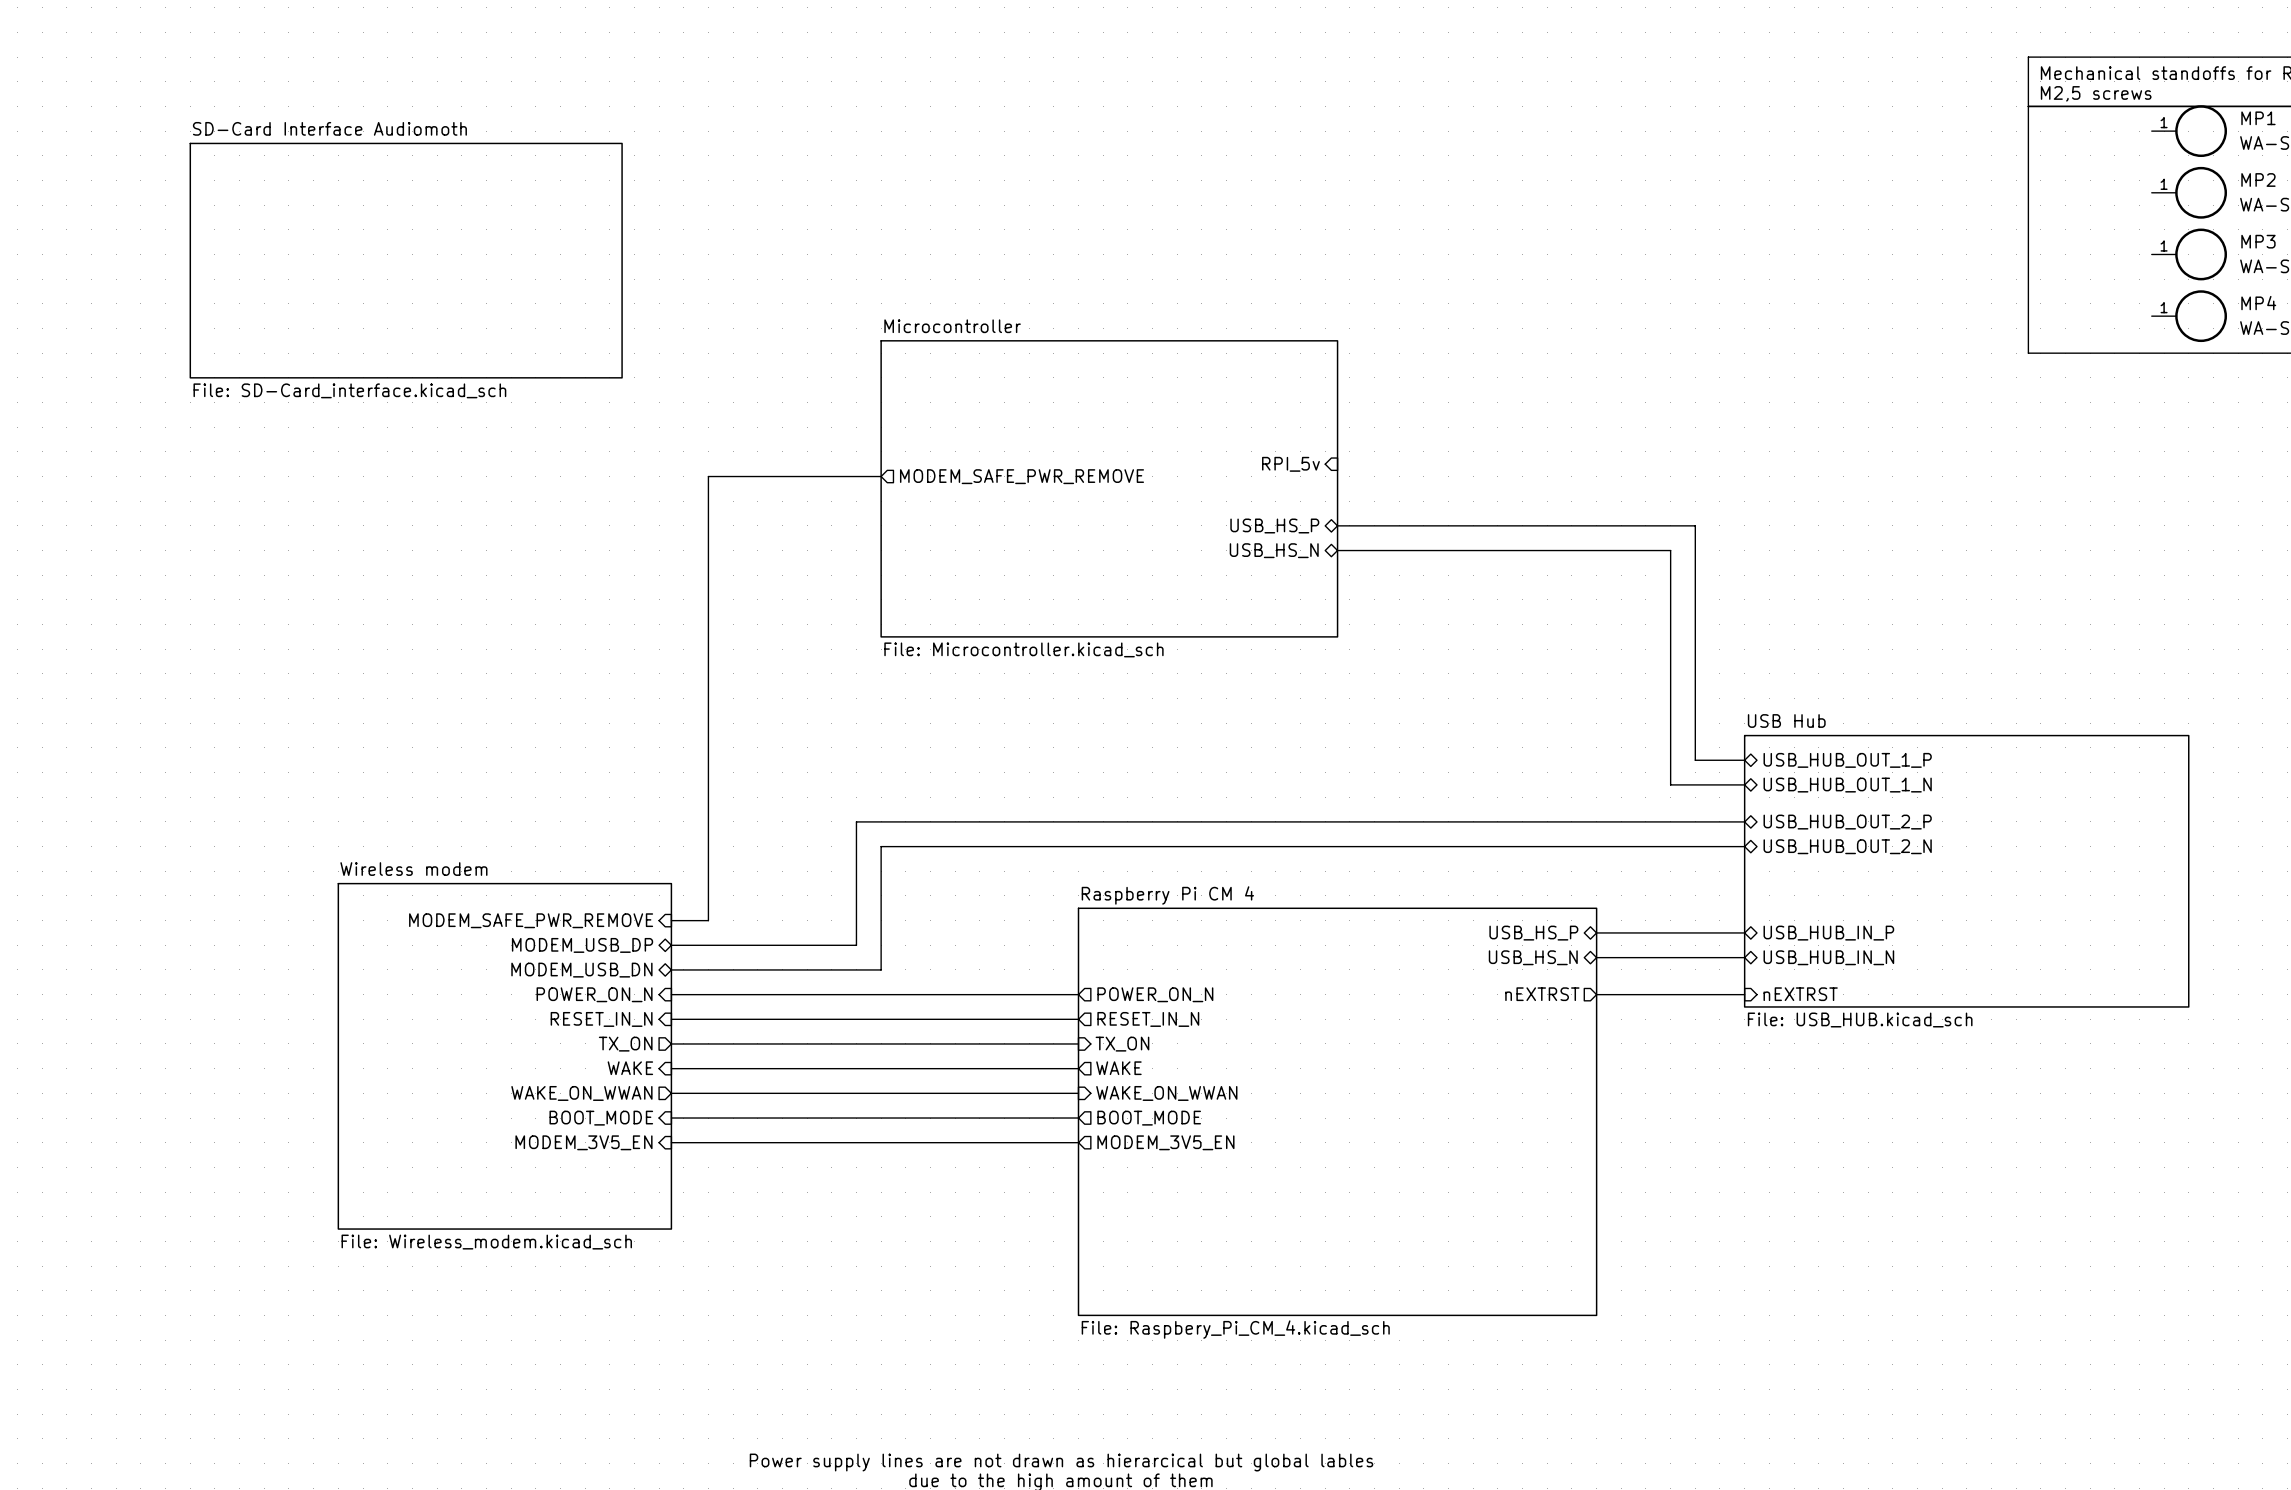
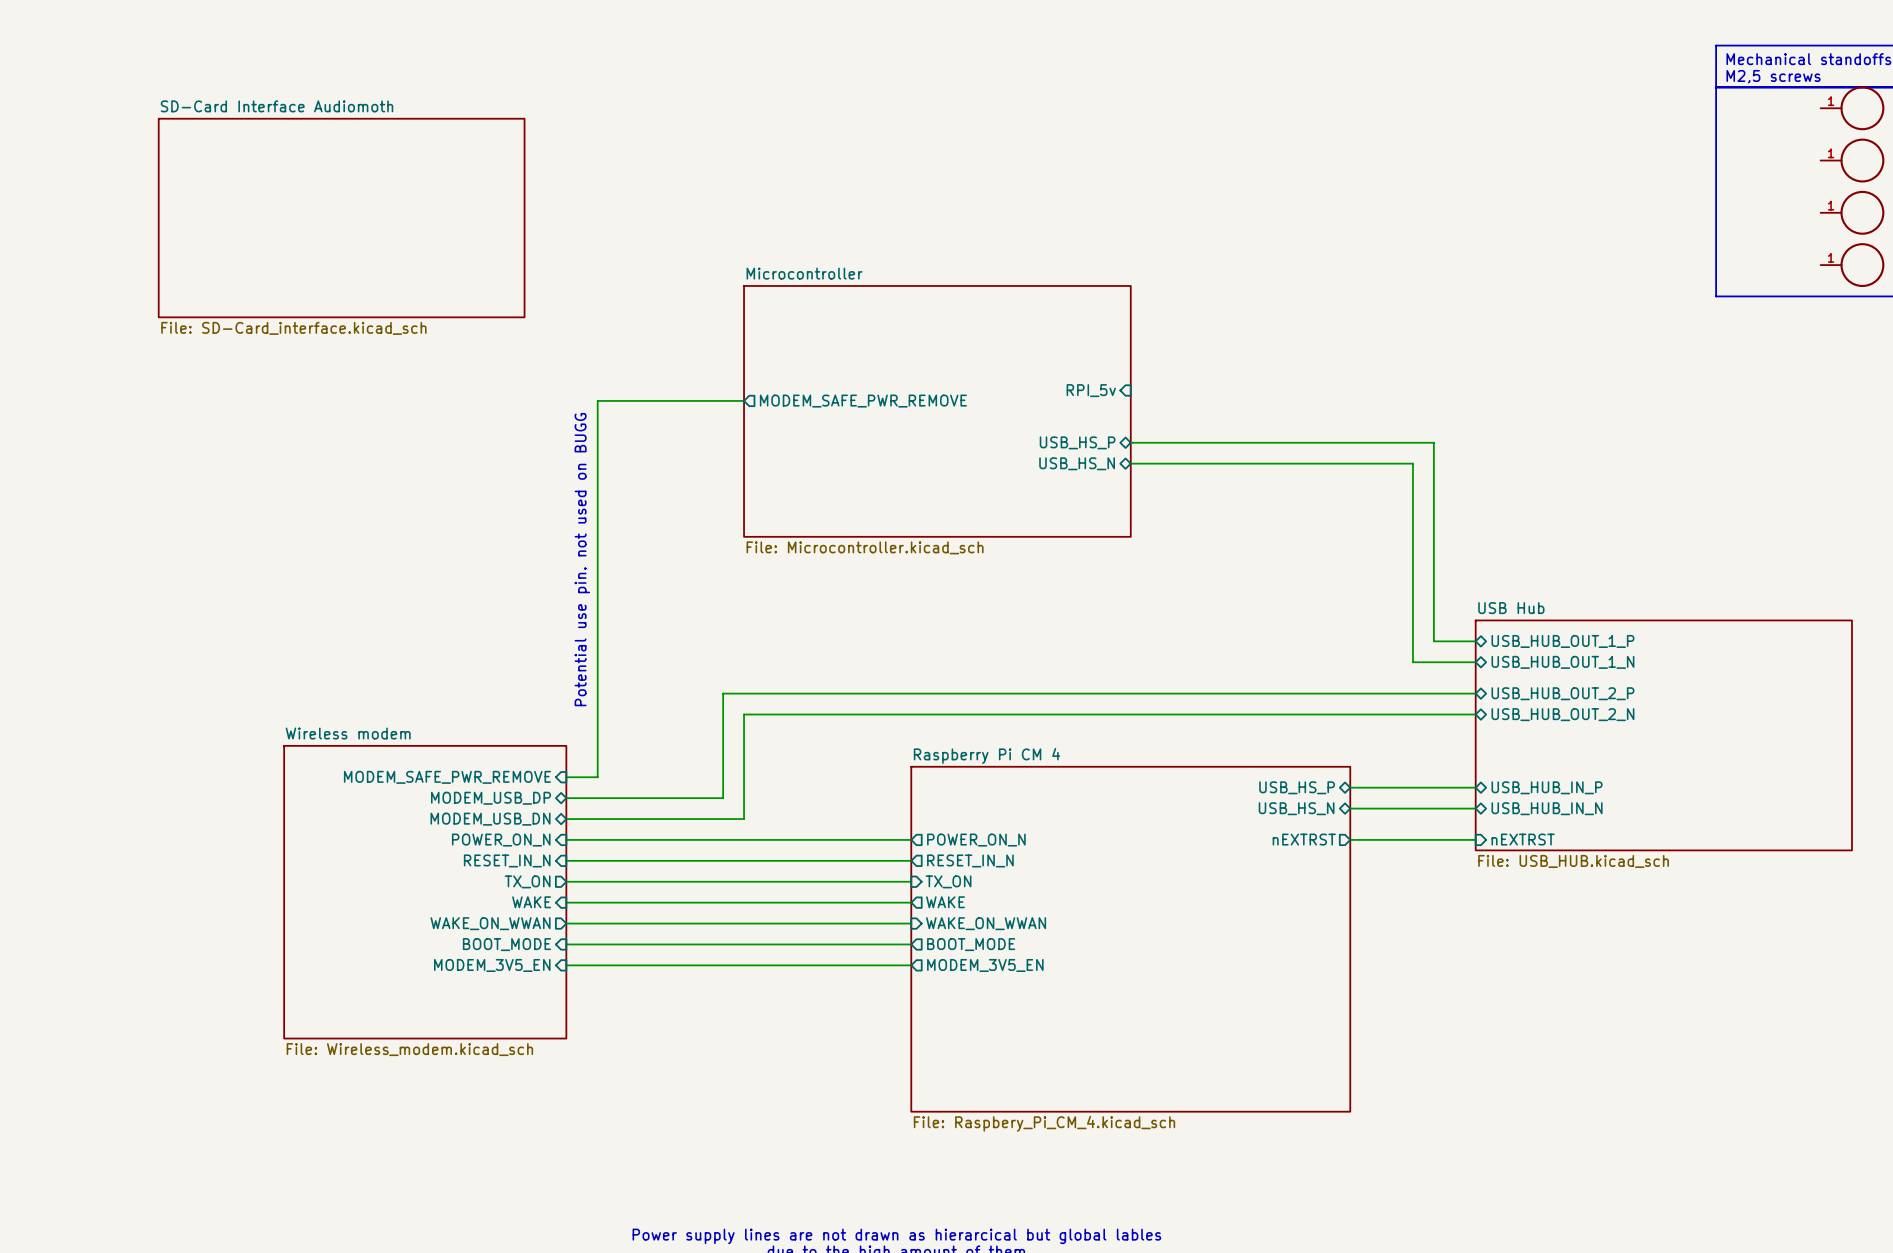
text: none -> Potential use pin. not used on BUGG (582, 559)

